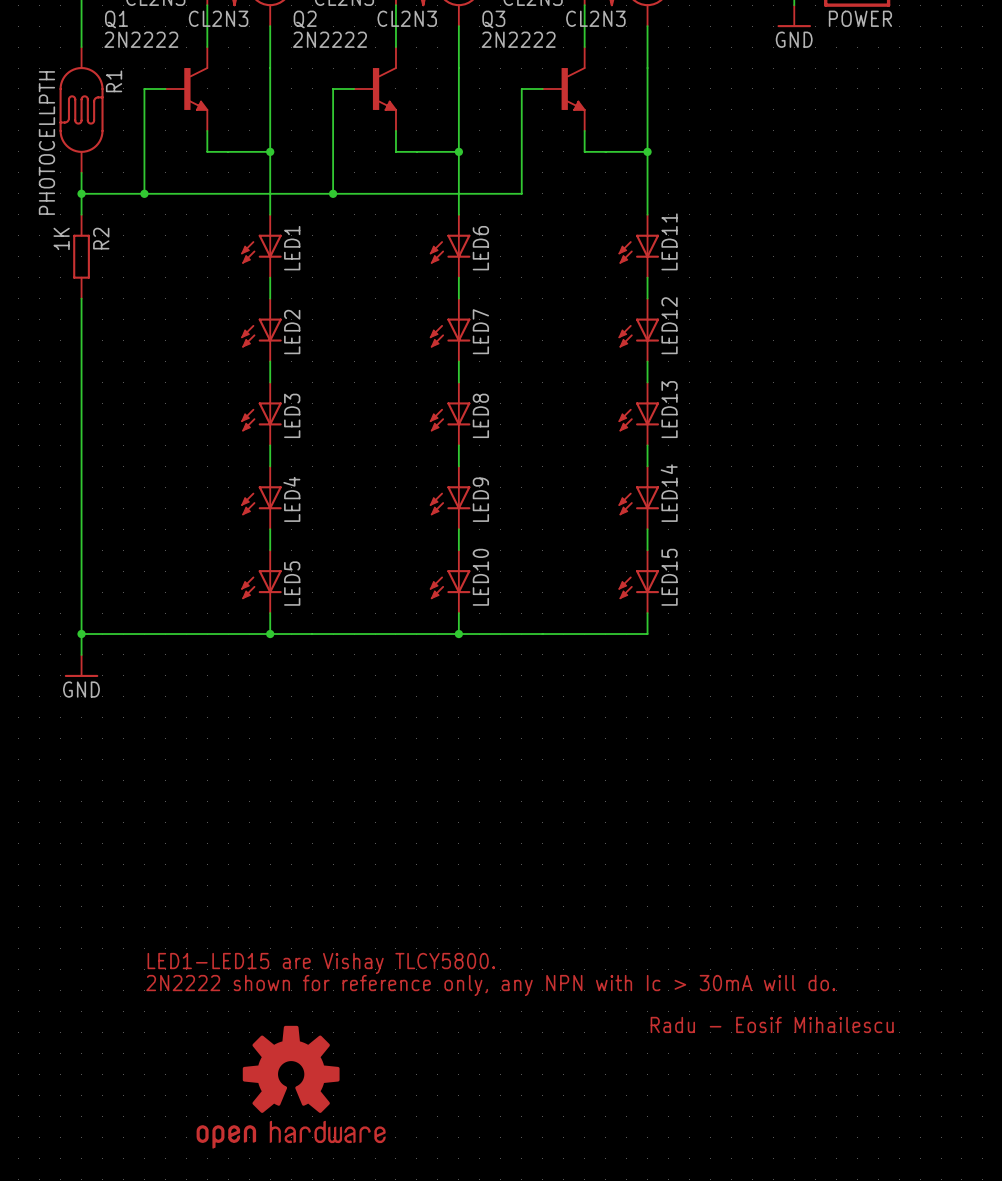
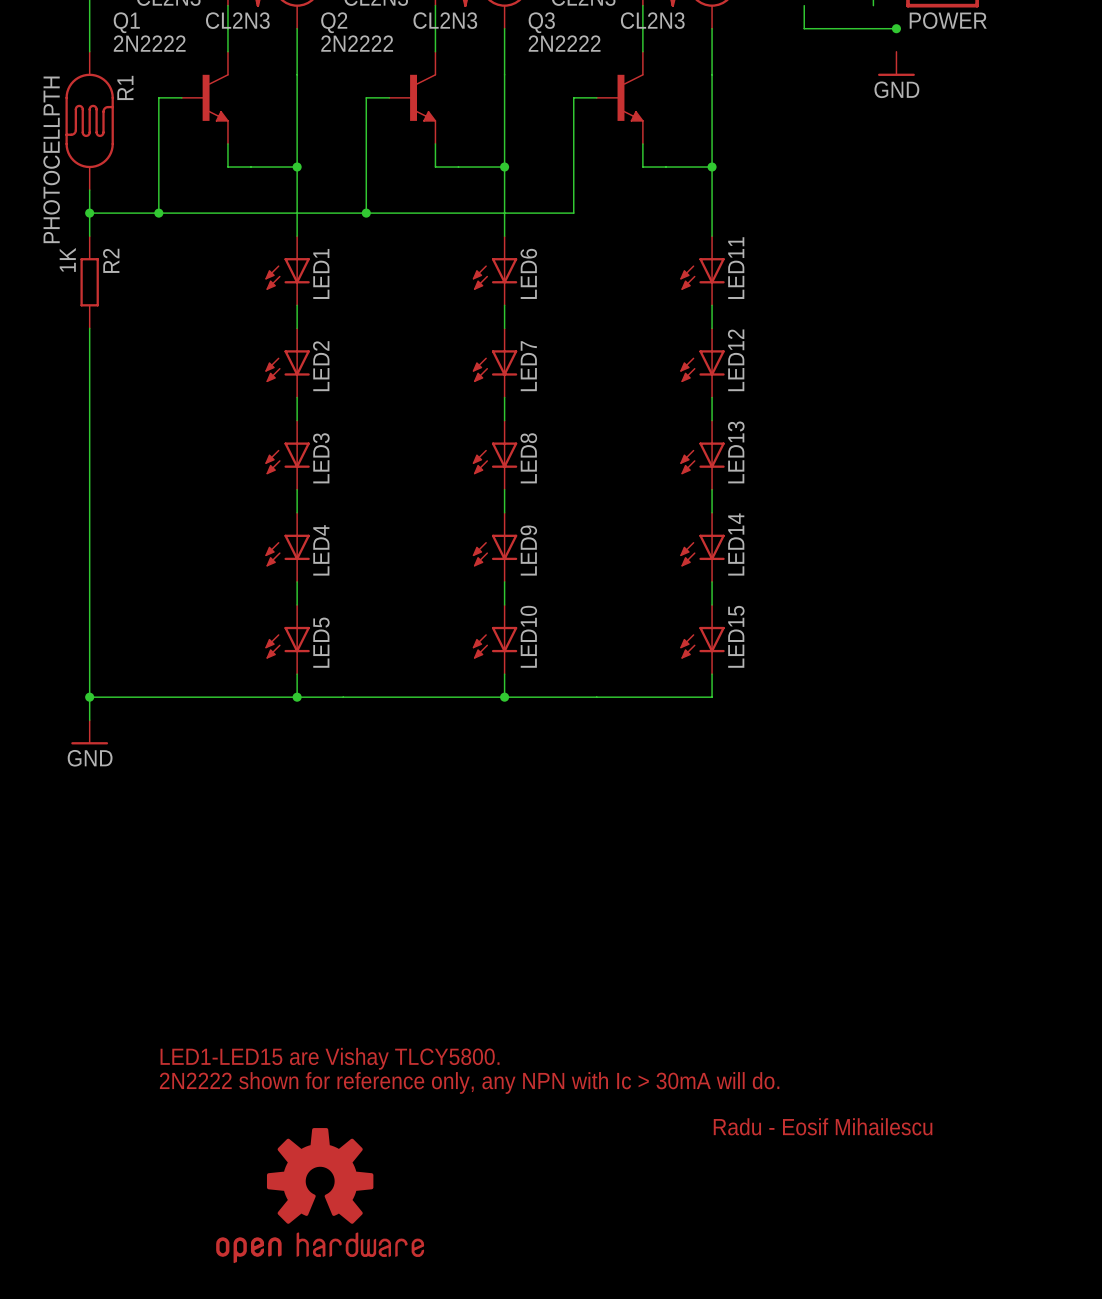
wire: none -> (804, 5) (804, 28) (896, 28)
power symbol position: GND (794, 16) -> GND (896, 63)
junction: none -> (896, 28)

